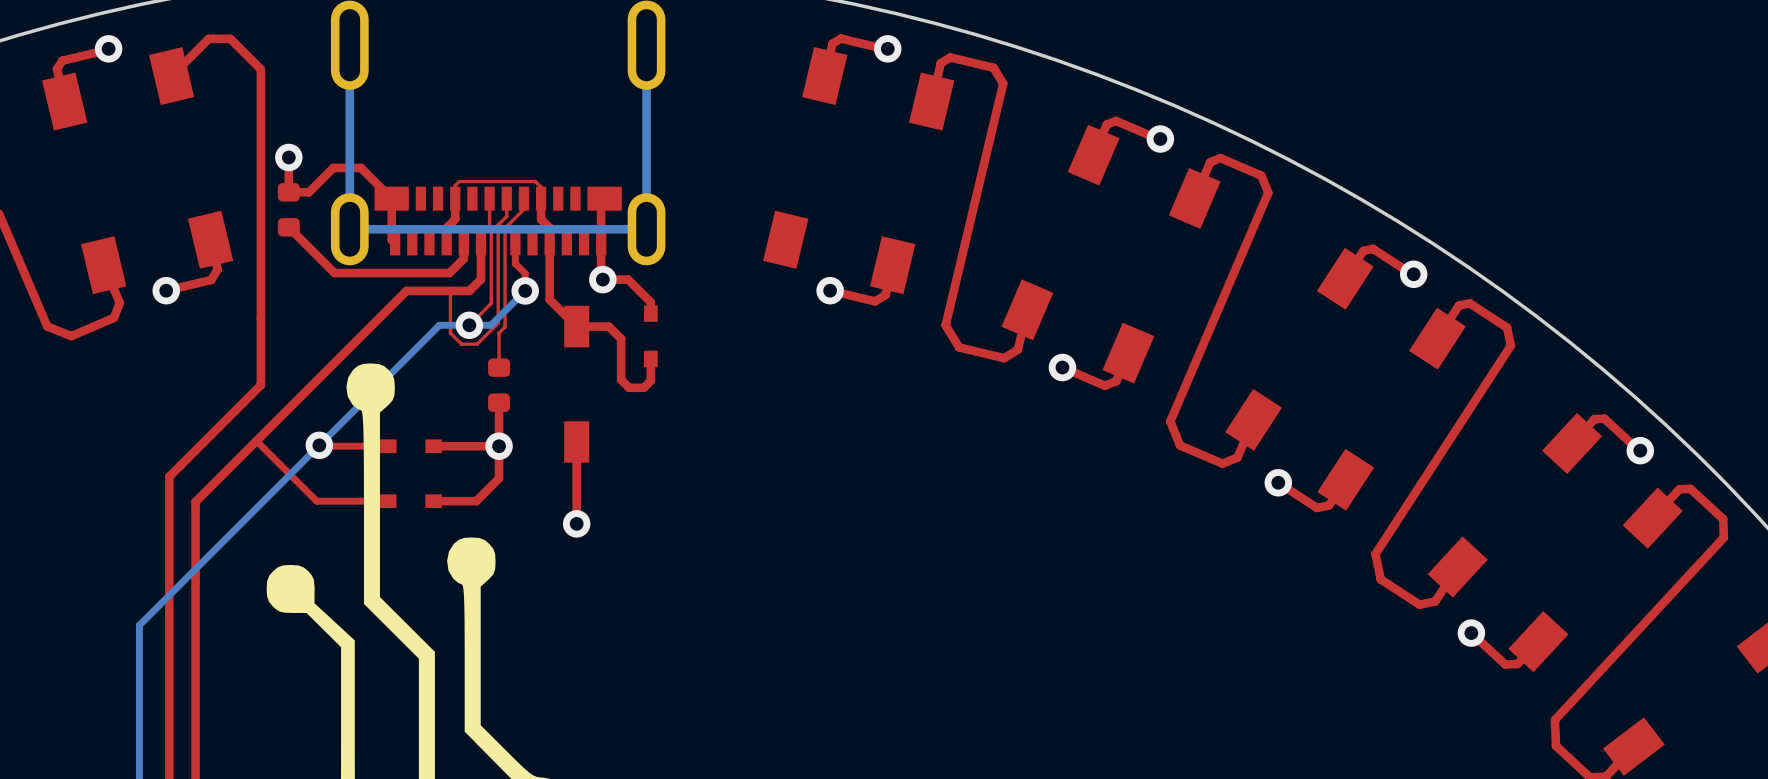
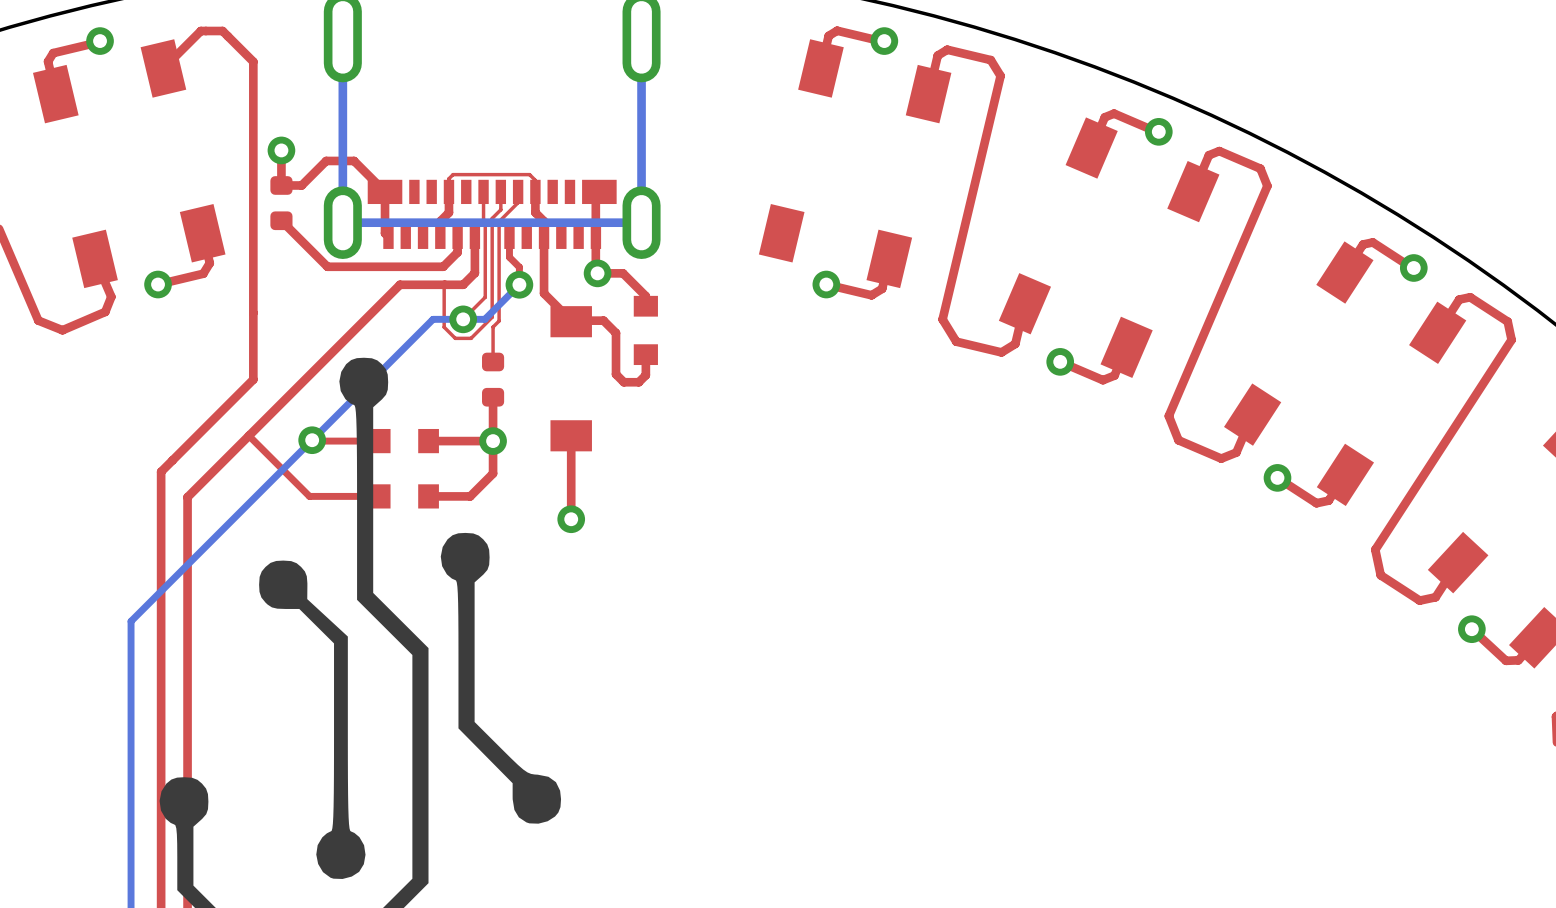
part footprint: [564, 305, 590, 463] -> [550, 306, 592, 452]
part footprint: [643, 305, 658, 368] -> [633, 295, 658, 366]
part footprint: [380, 439, 442, 454] -> [369, 428, 439, 454]
part footprint: [380, 494, 442, 509] -> [369, 484, 439, 509]

